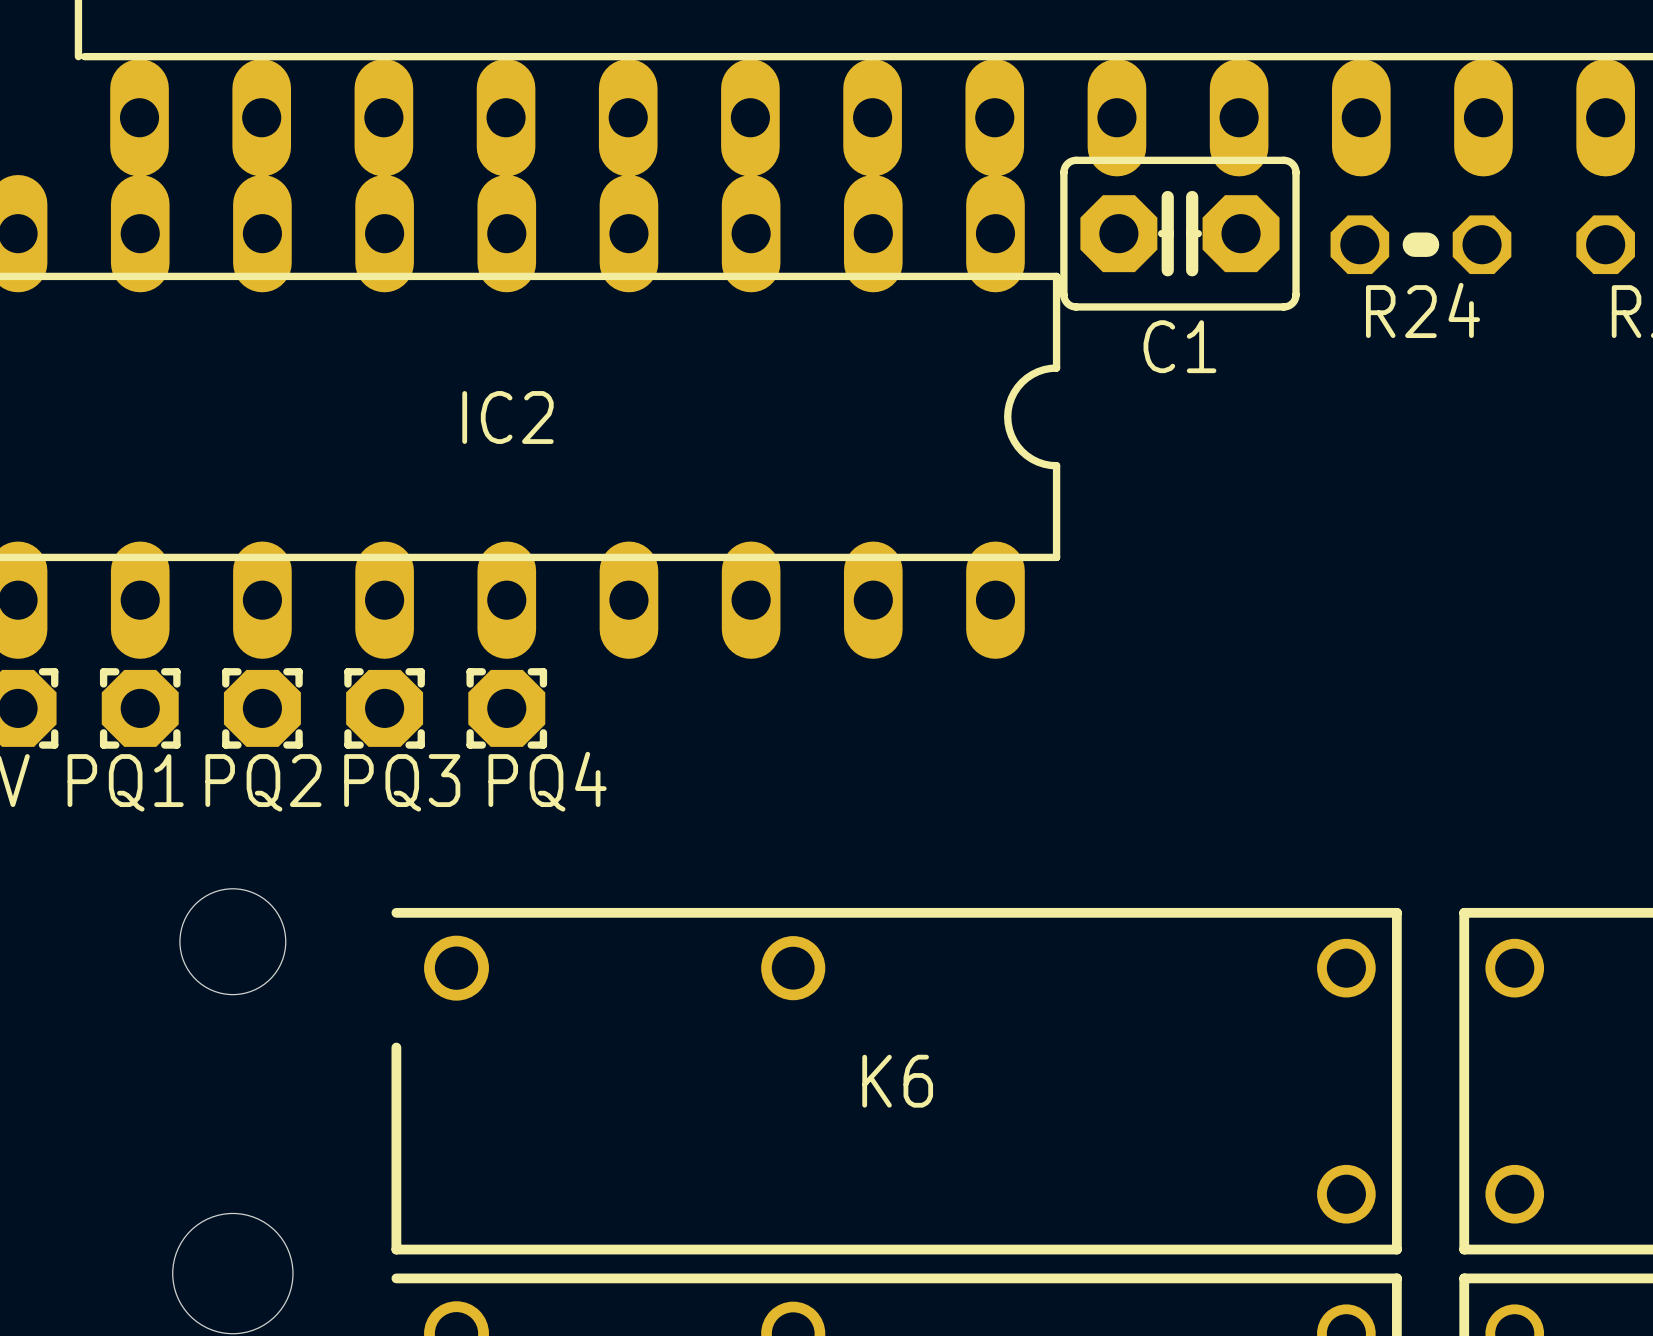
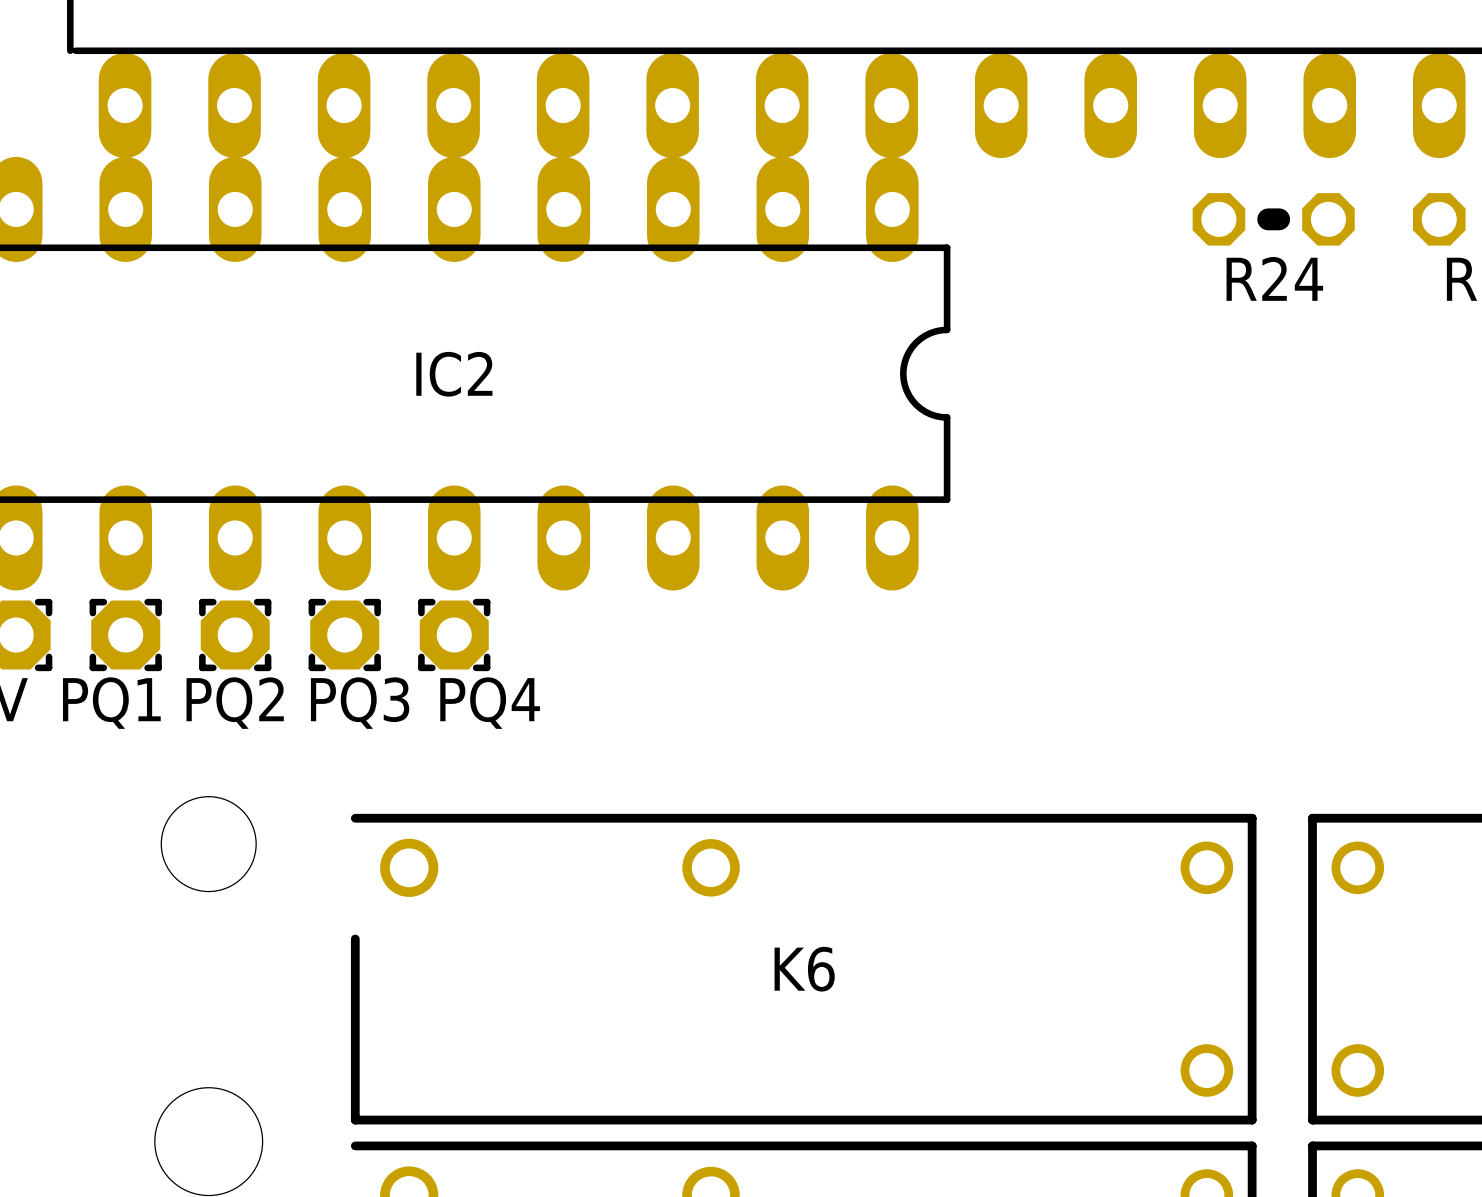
C1: (1179, 233) -> none

